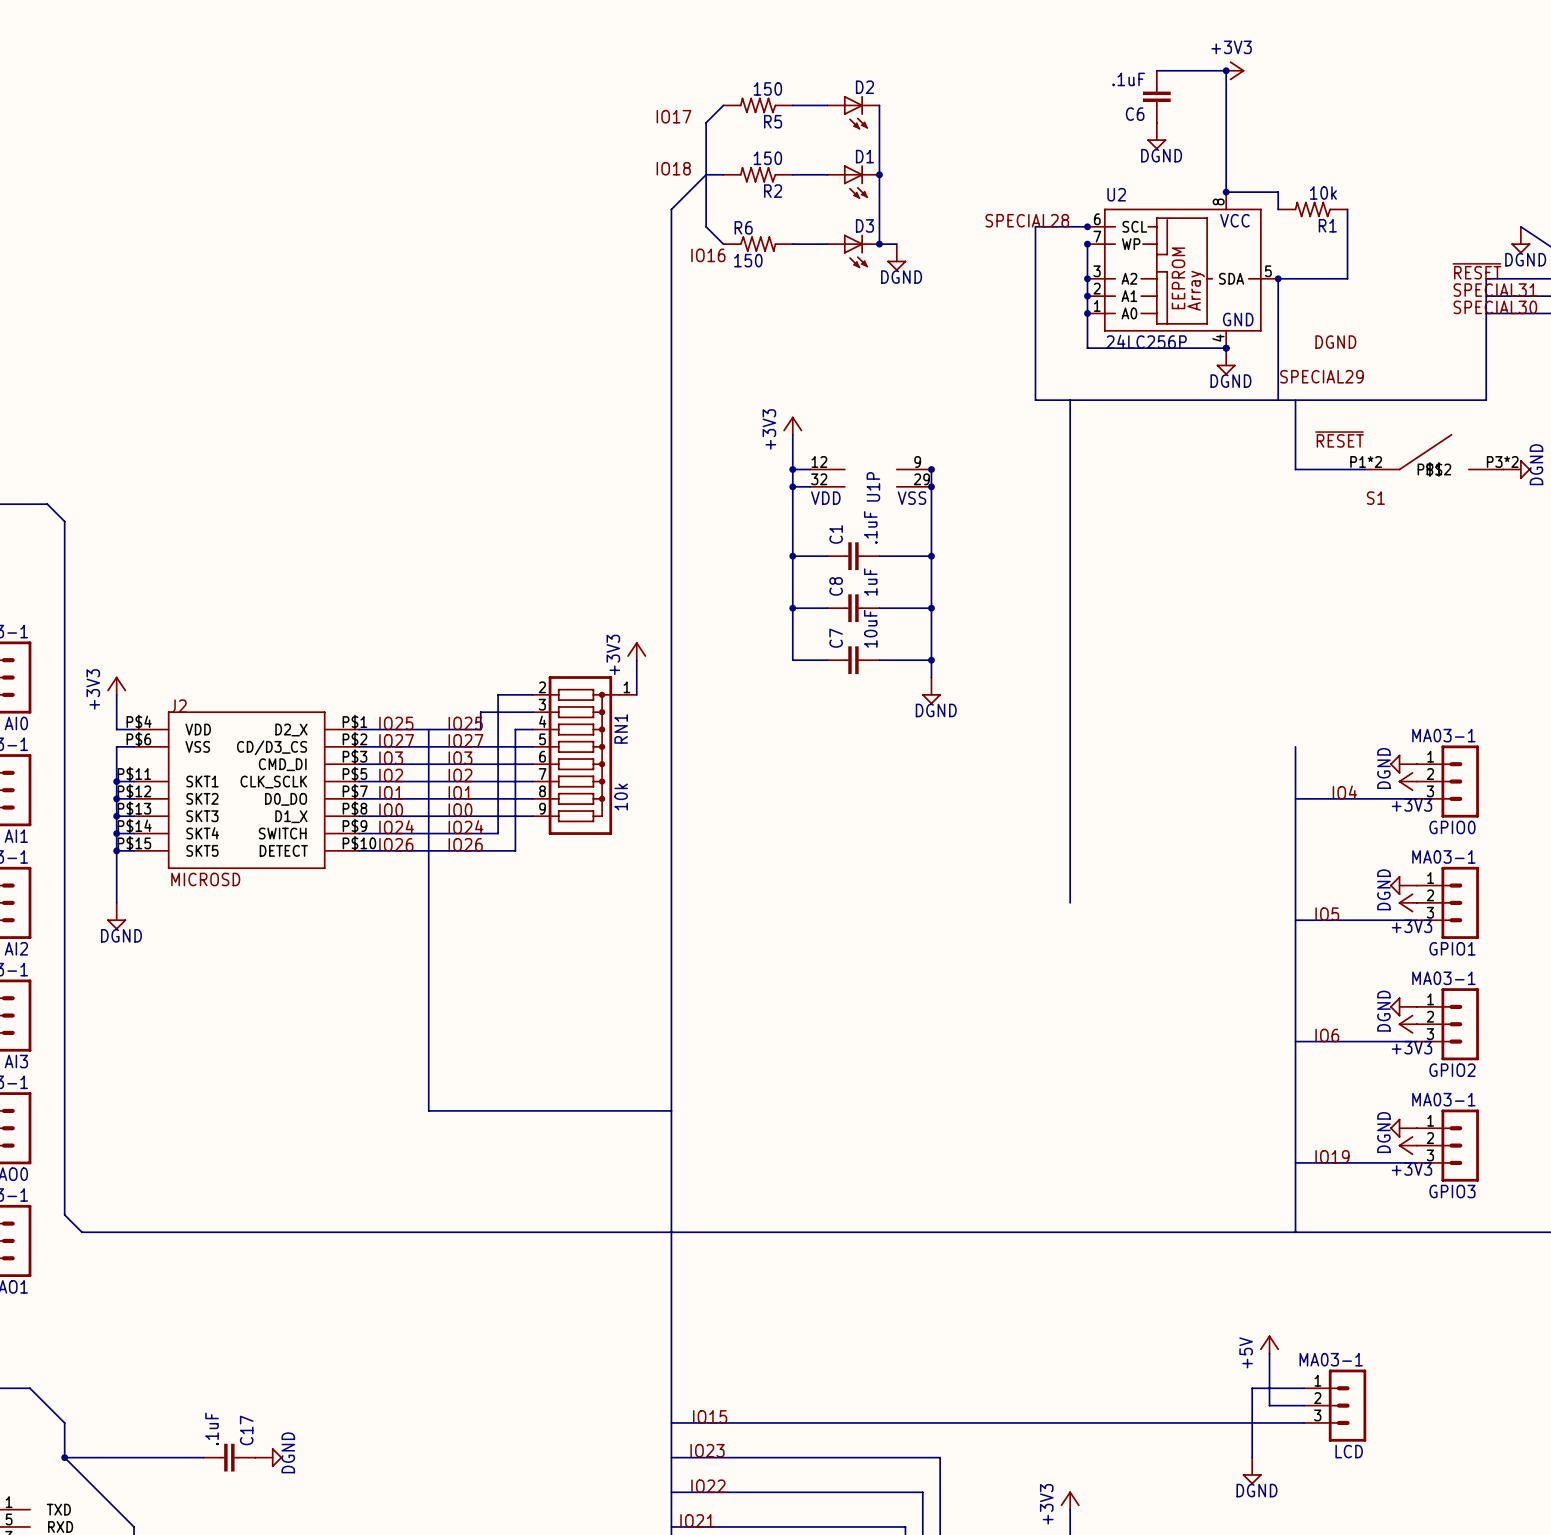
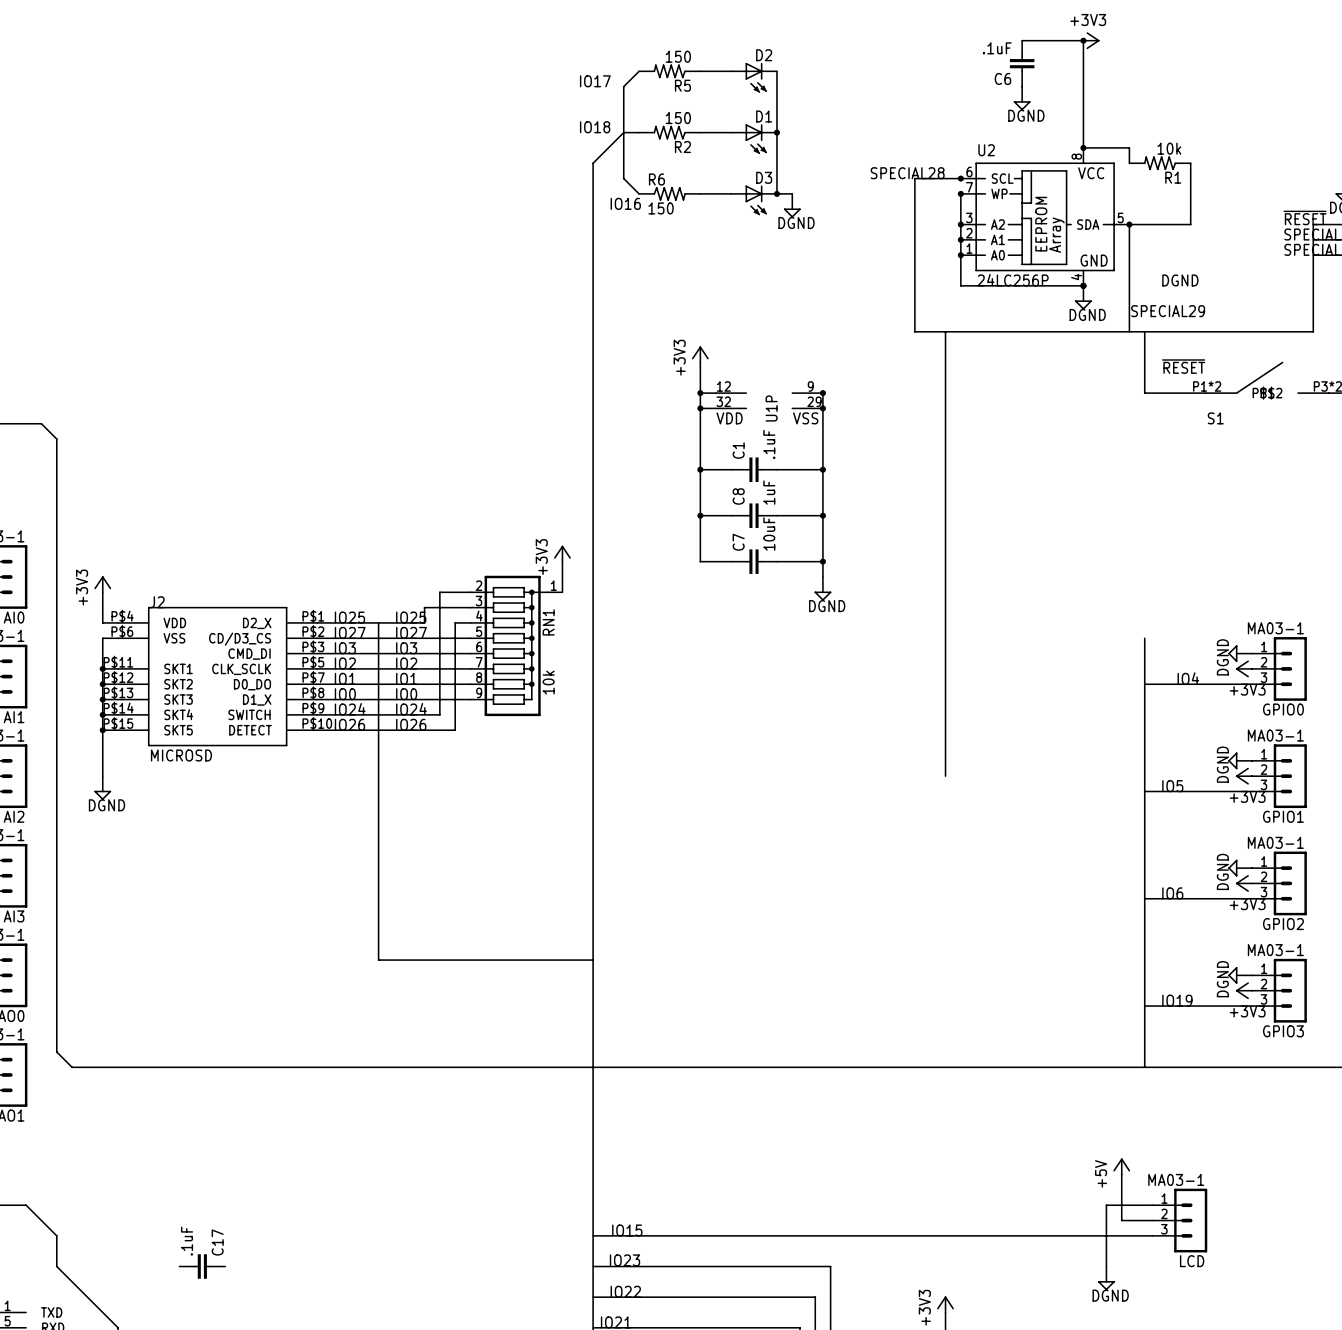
wire: (64, 1457) (203, 1457) -> none
junction: (64, 1457) -> none
power symbol: DGND (268, 1457) -> none

